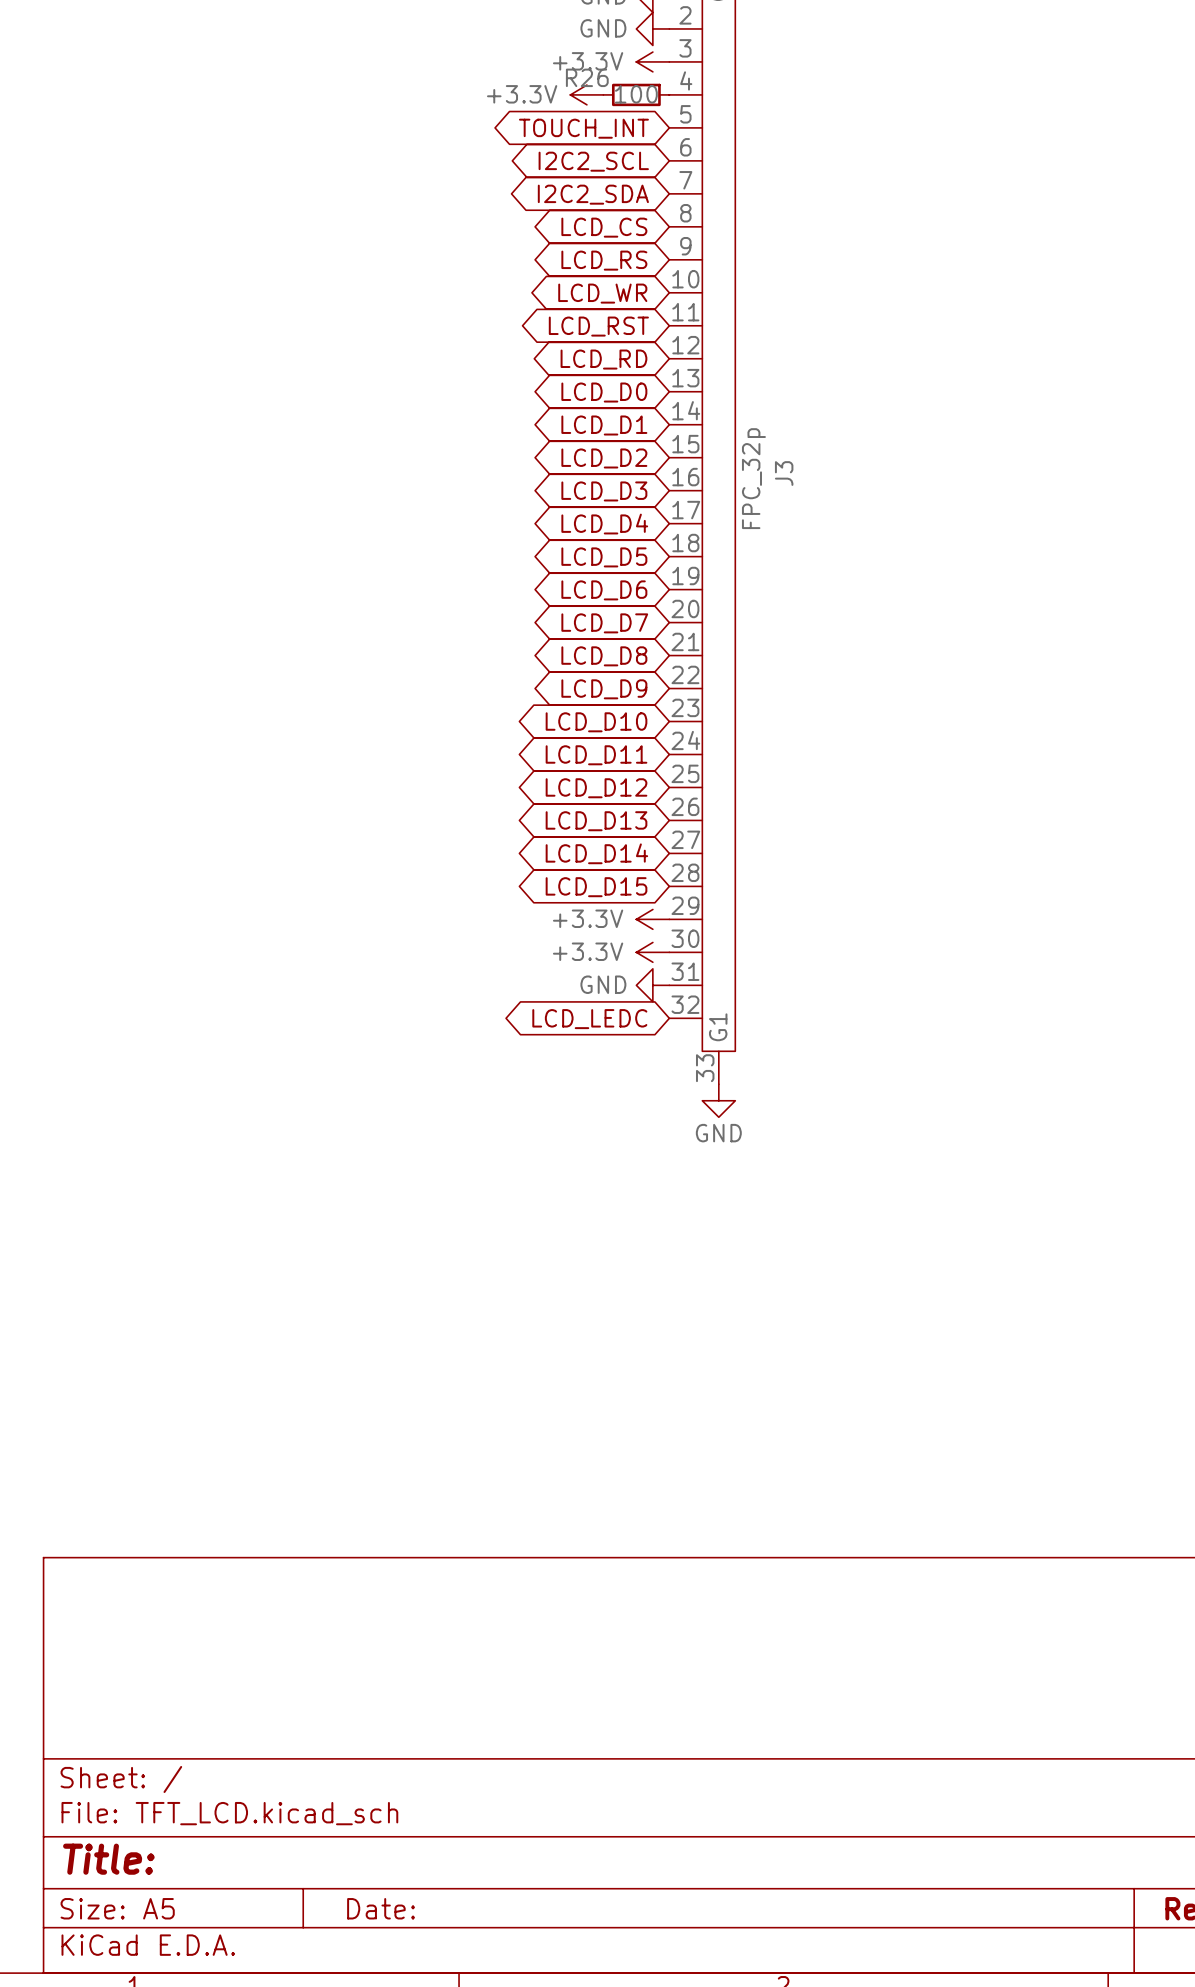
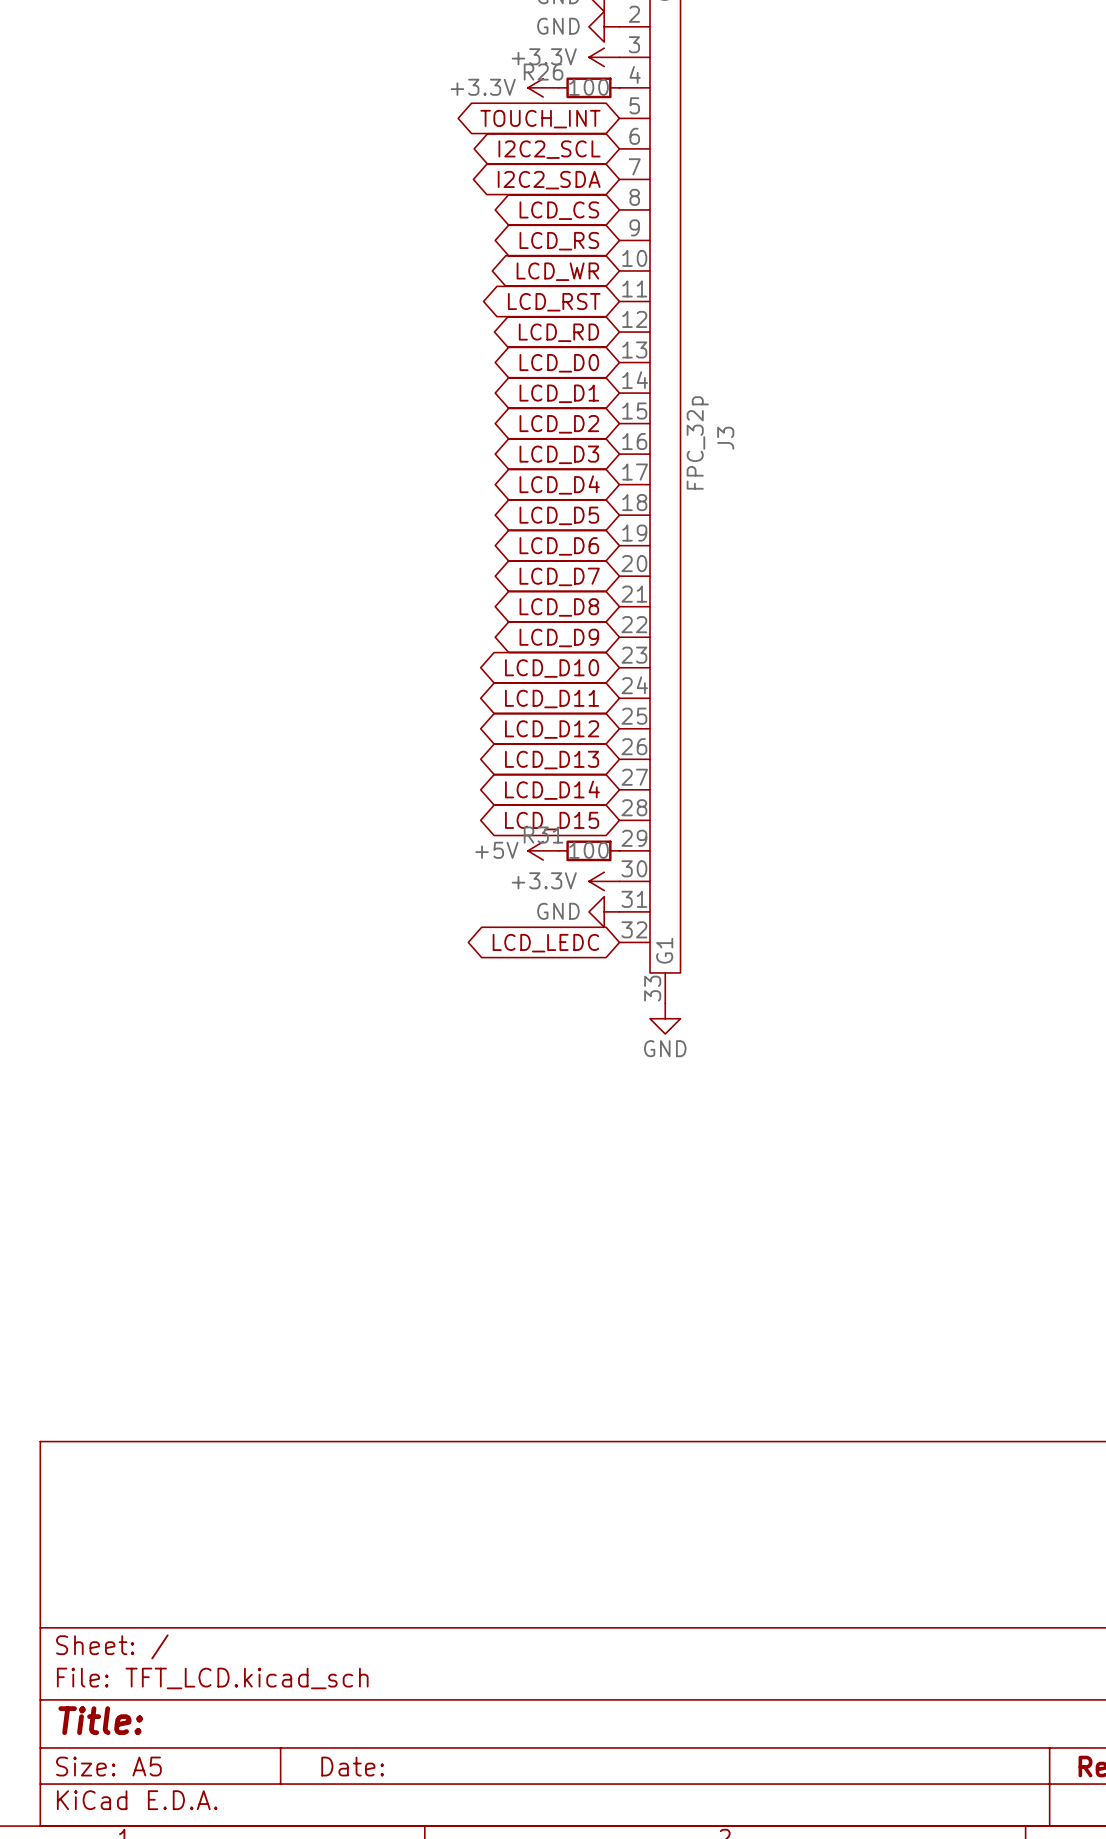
power symbol: none -> +5V (543, 850)
R31: none -> 100 (588, 850)
power symbol: +3.3V (652, 919) -> none

